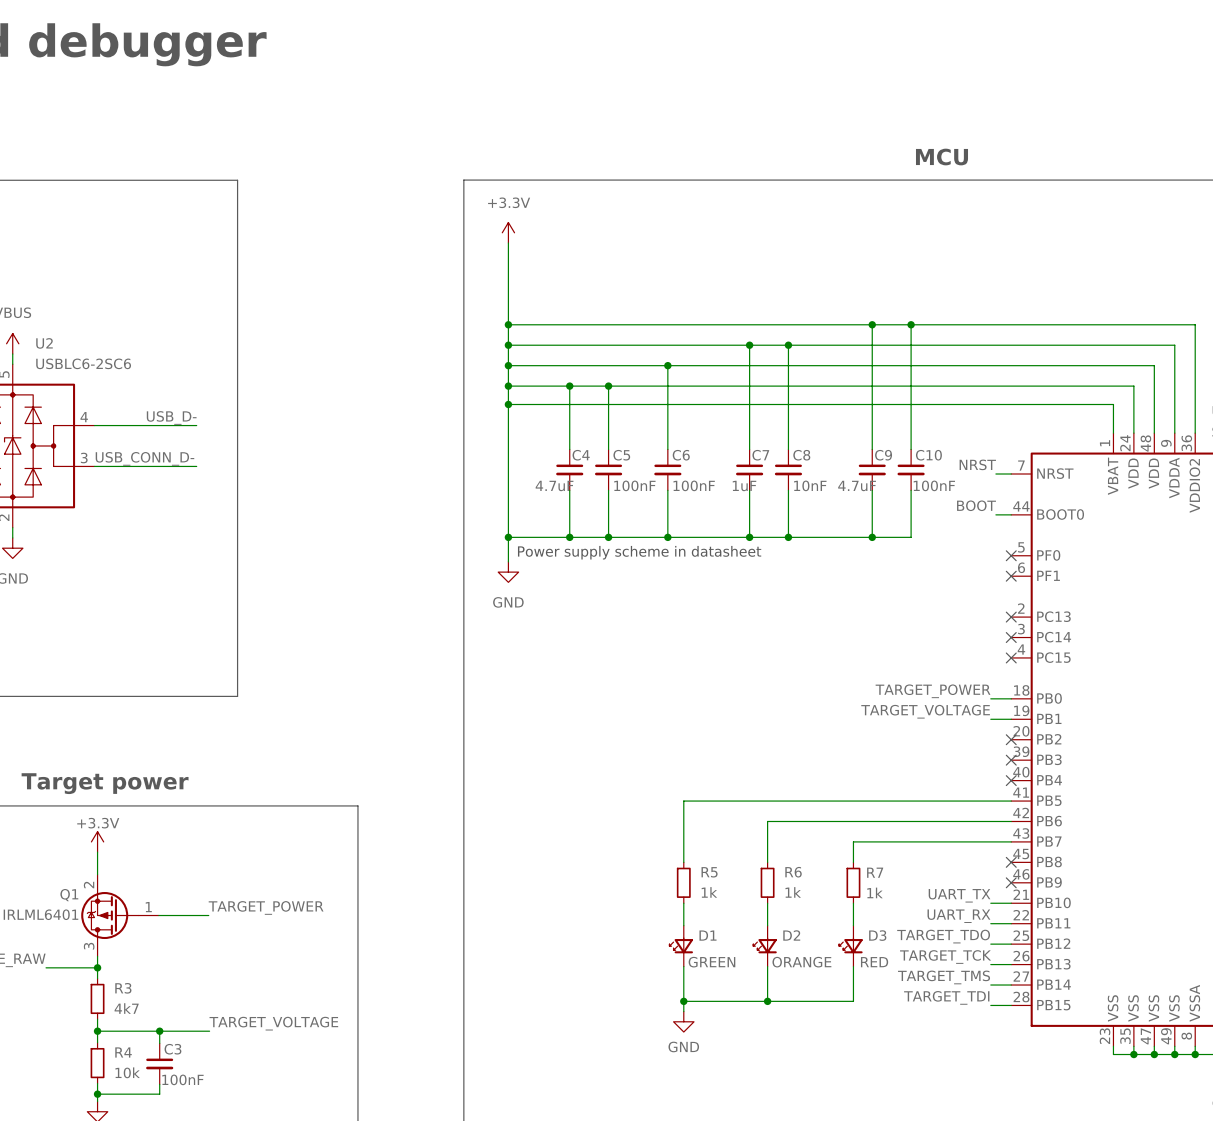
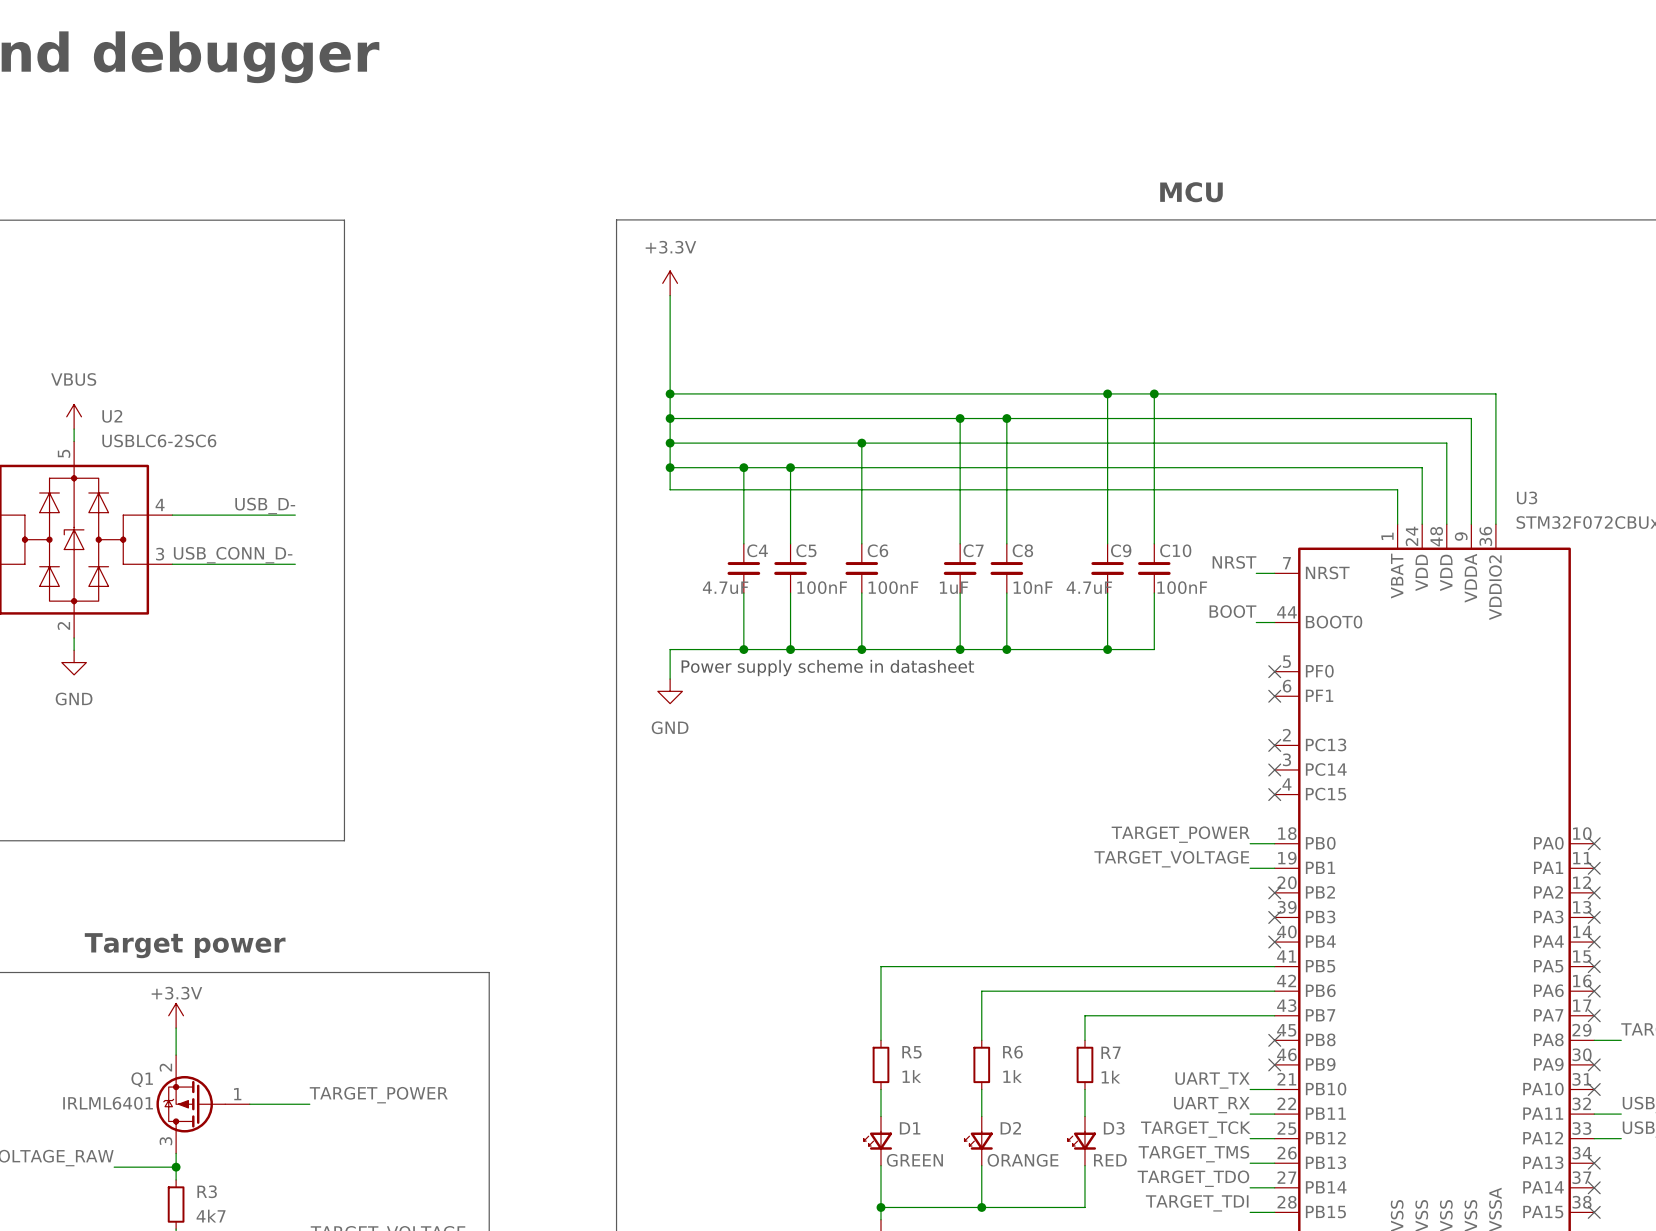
wire: (508, 404) (508, 537) -> none
junction: (508, 404) -> none
junction: (508, 537) -> none
label: TARGET_TDO (943, 936) -> TARGET_TCK (1195, 1129)
label: TARGET_TCK (945, 957) -> TARGET_TMS (1193, 1154)
label: TARGET_TMS (944, 977) -> TARGET_TDO (1193, 1178)

